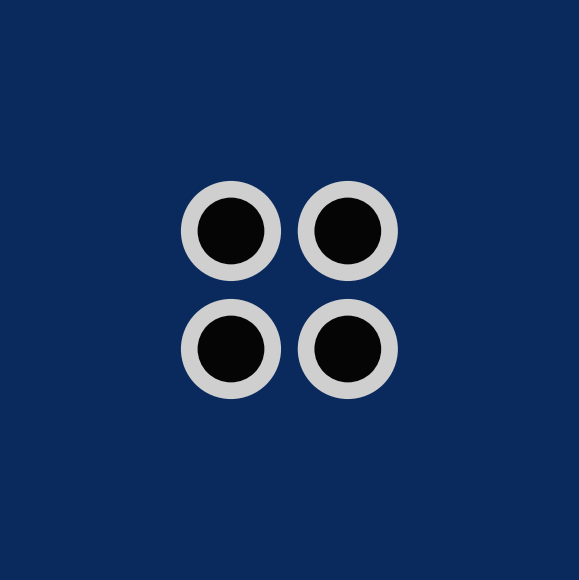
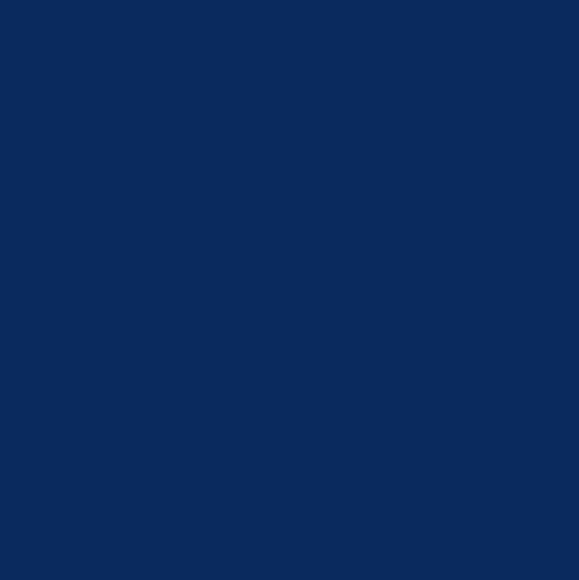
part: (289, 289) -> none

